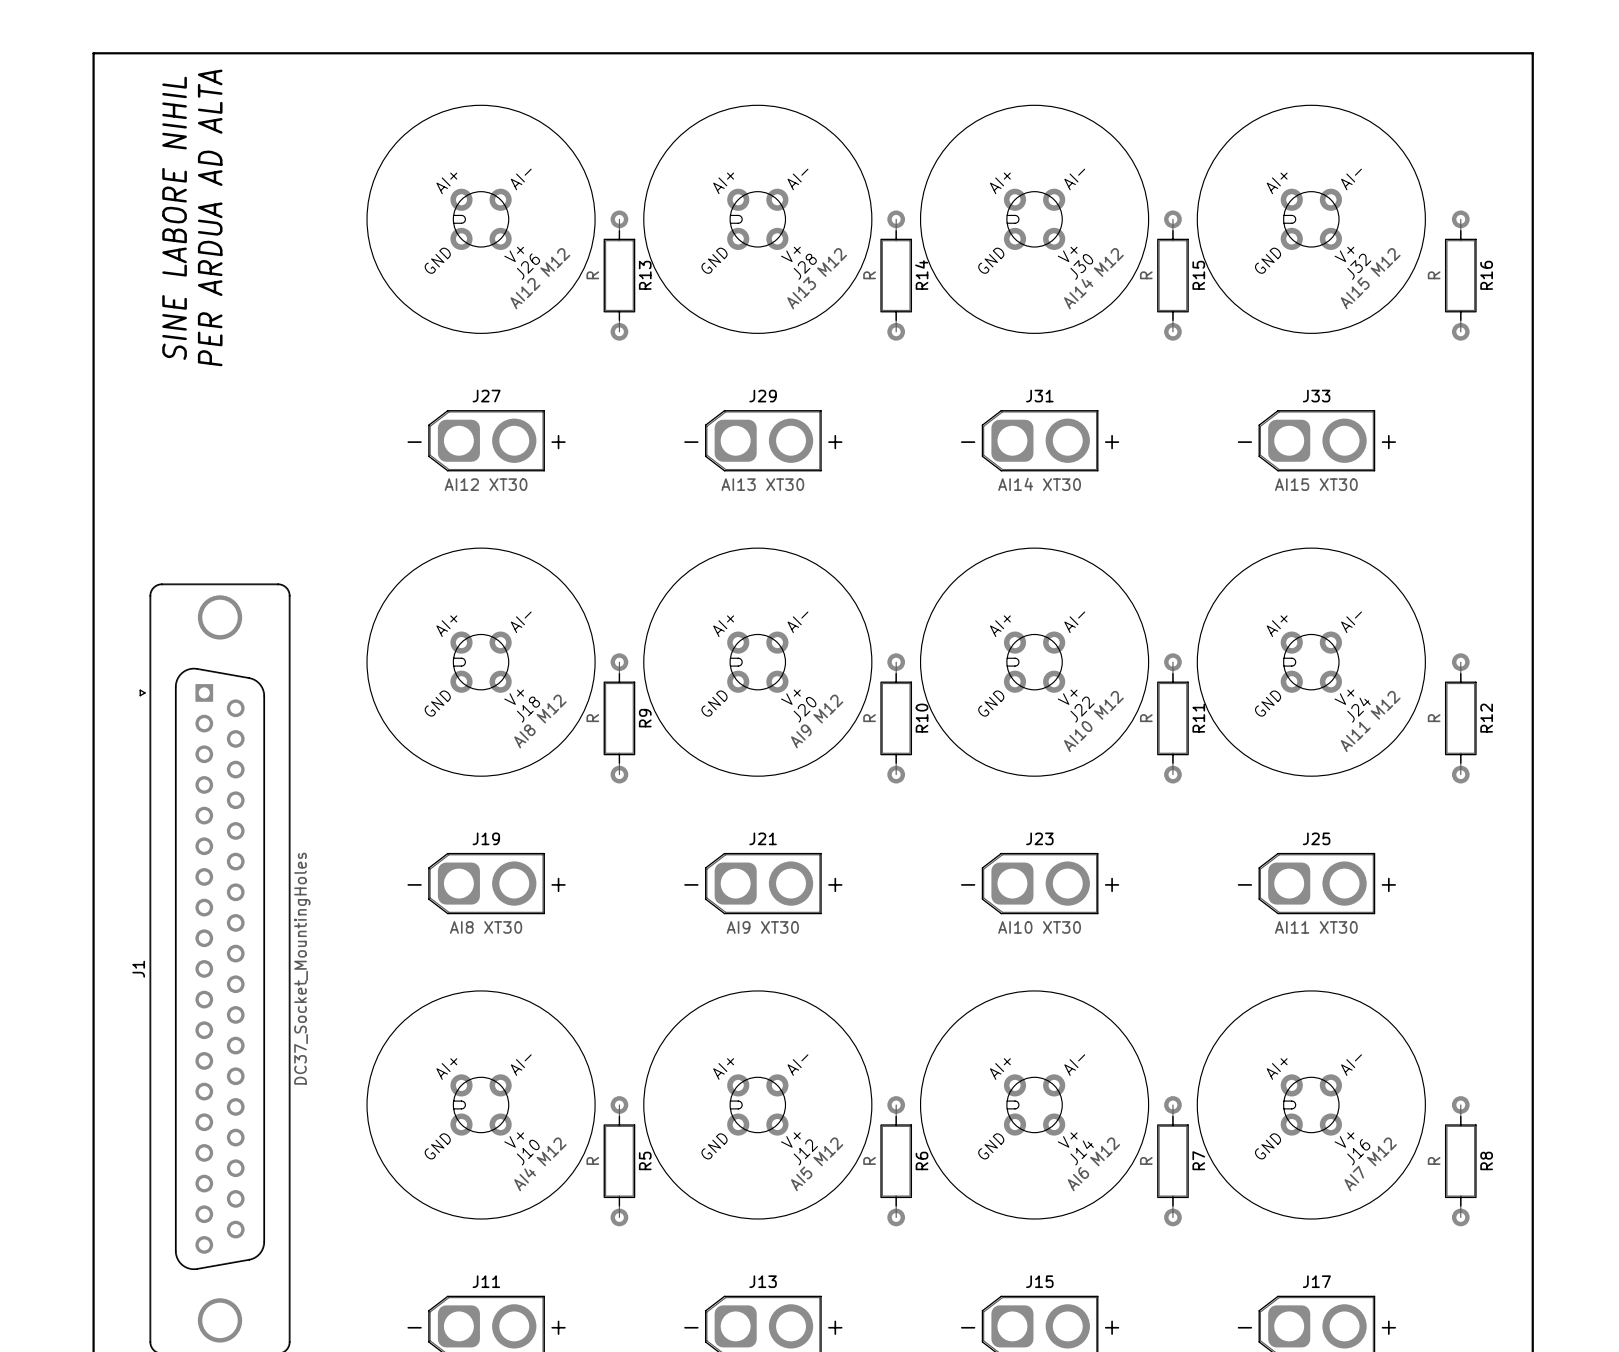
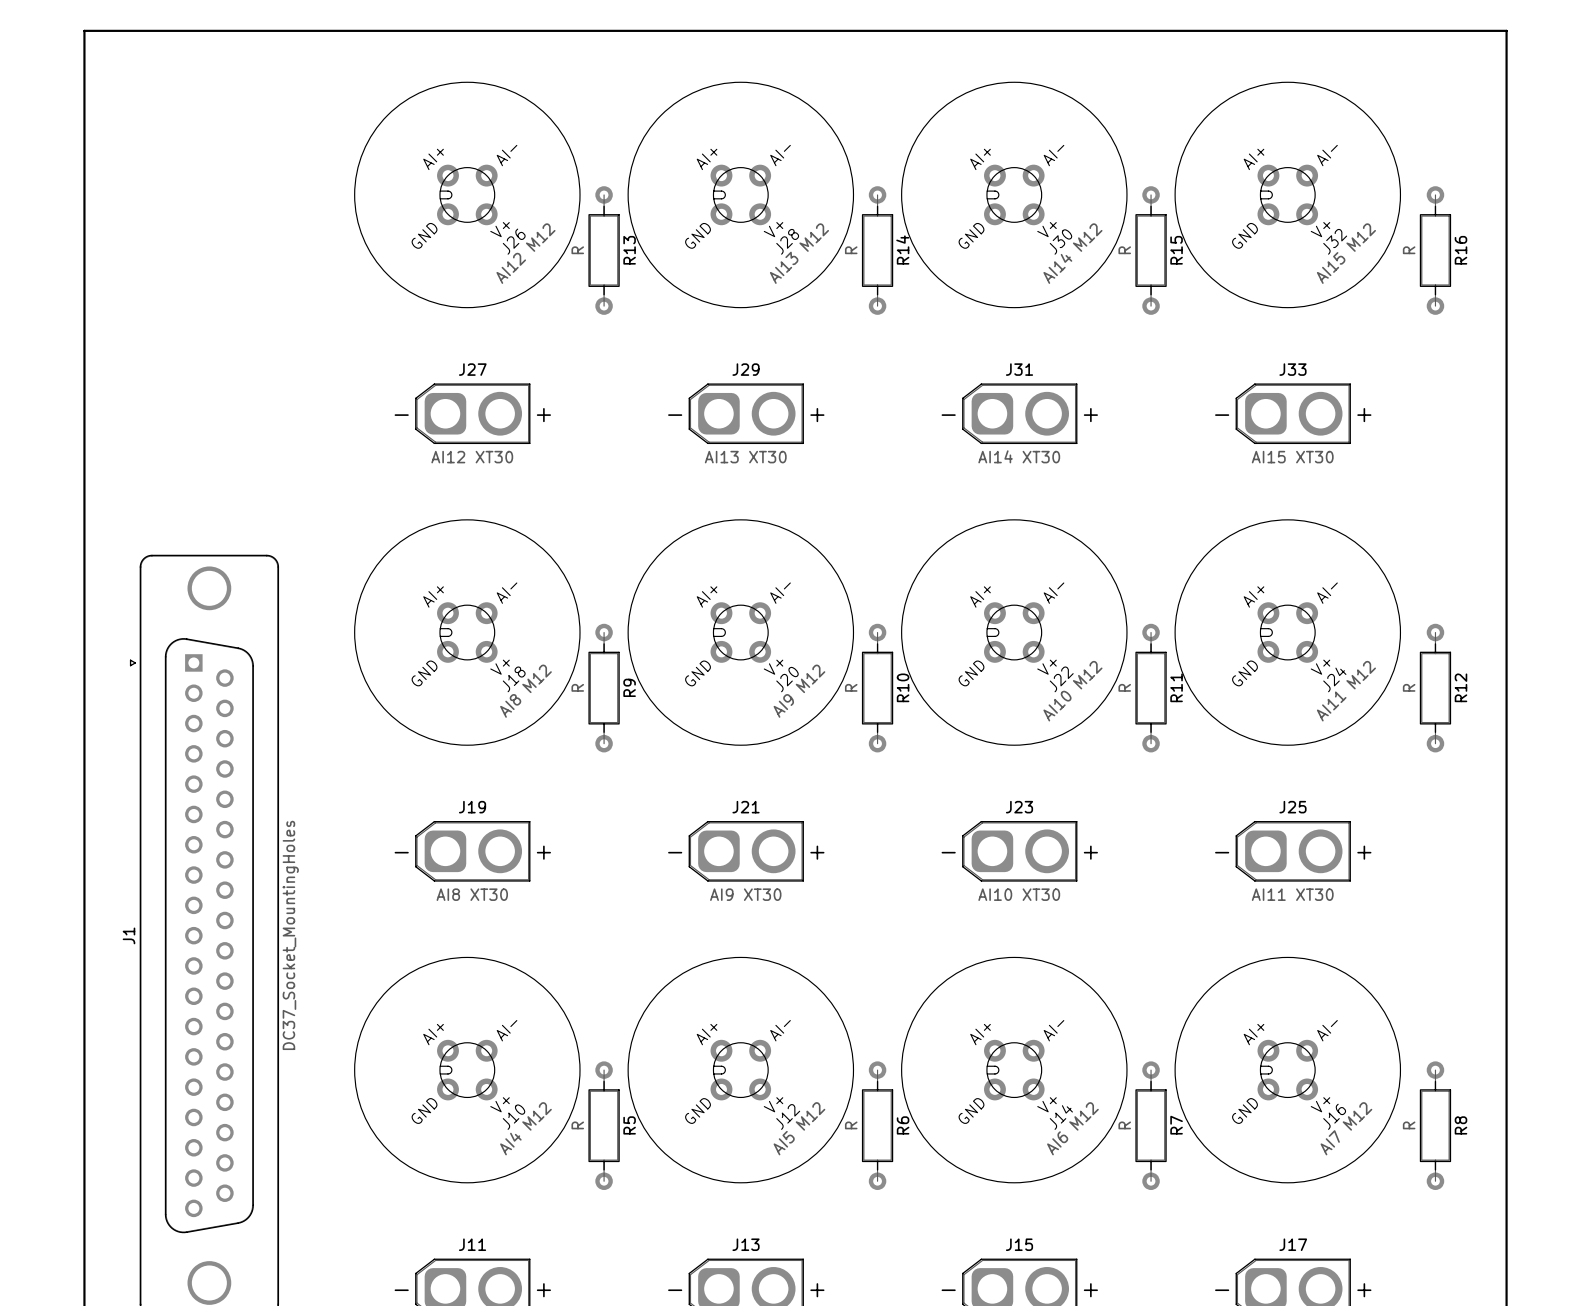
text: PER ARDUA AD ALTA (210, 217) -> none
text: SINE LABORE NIHIL (174, 218) -> none

